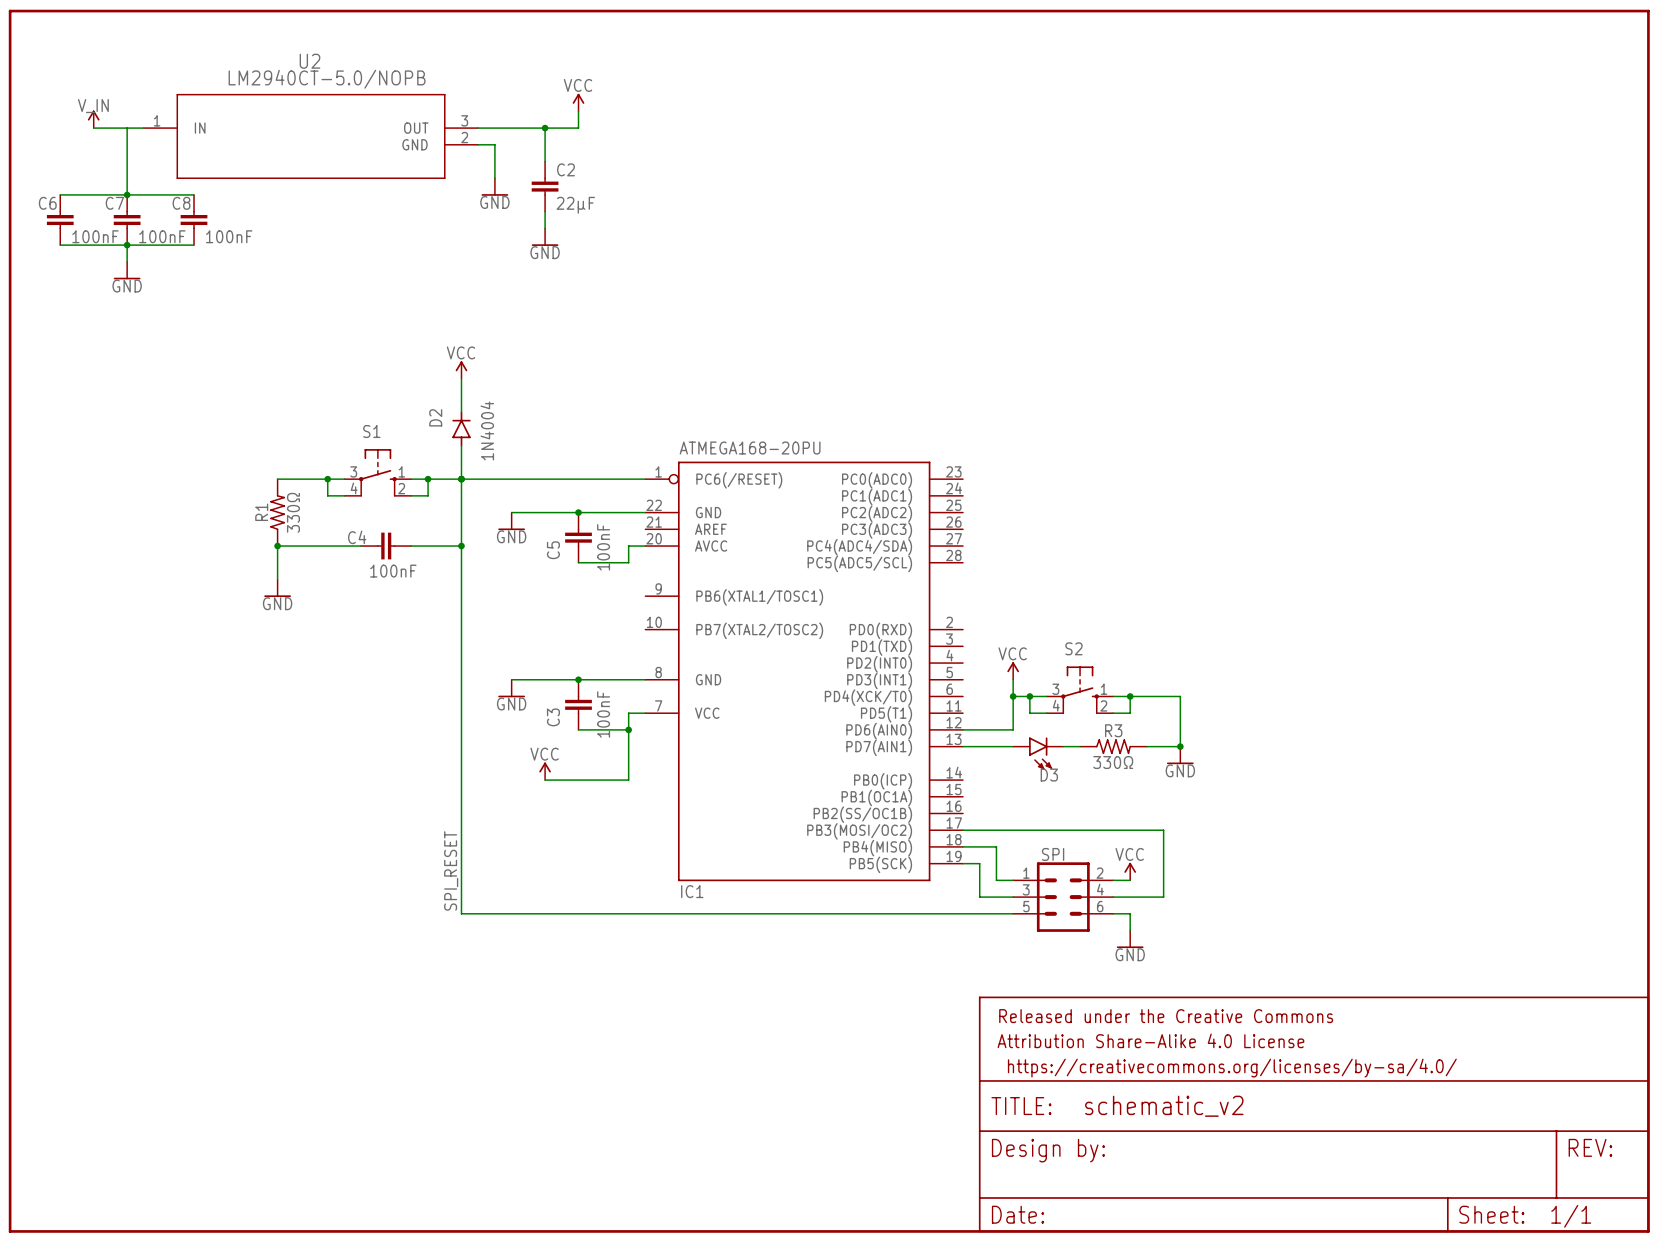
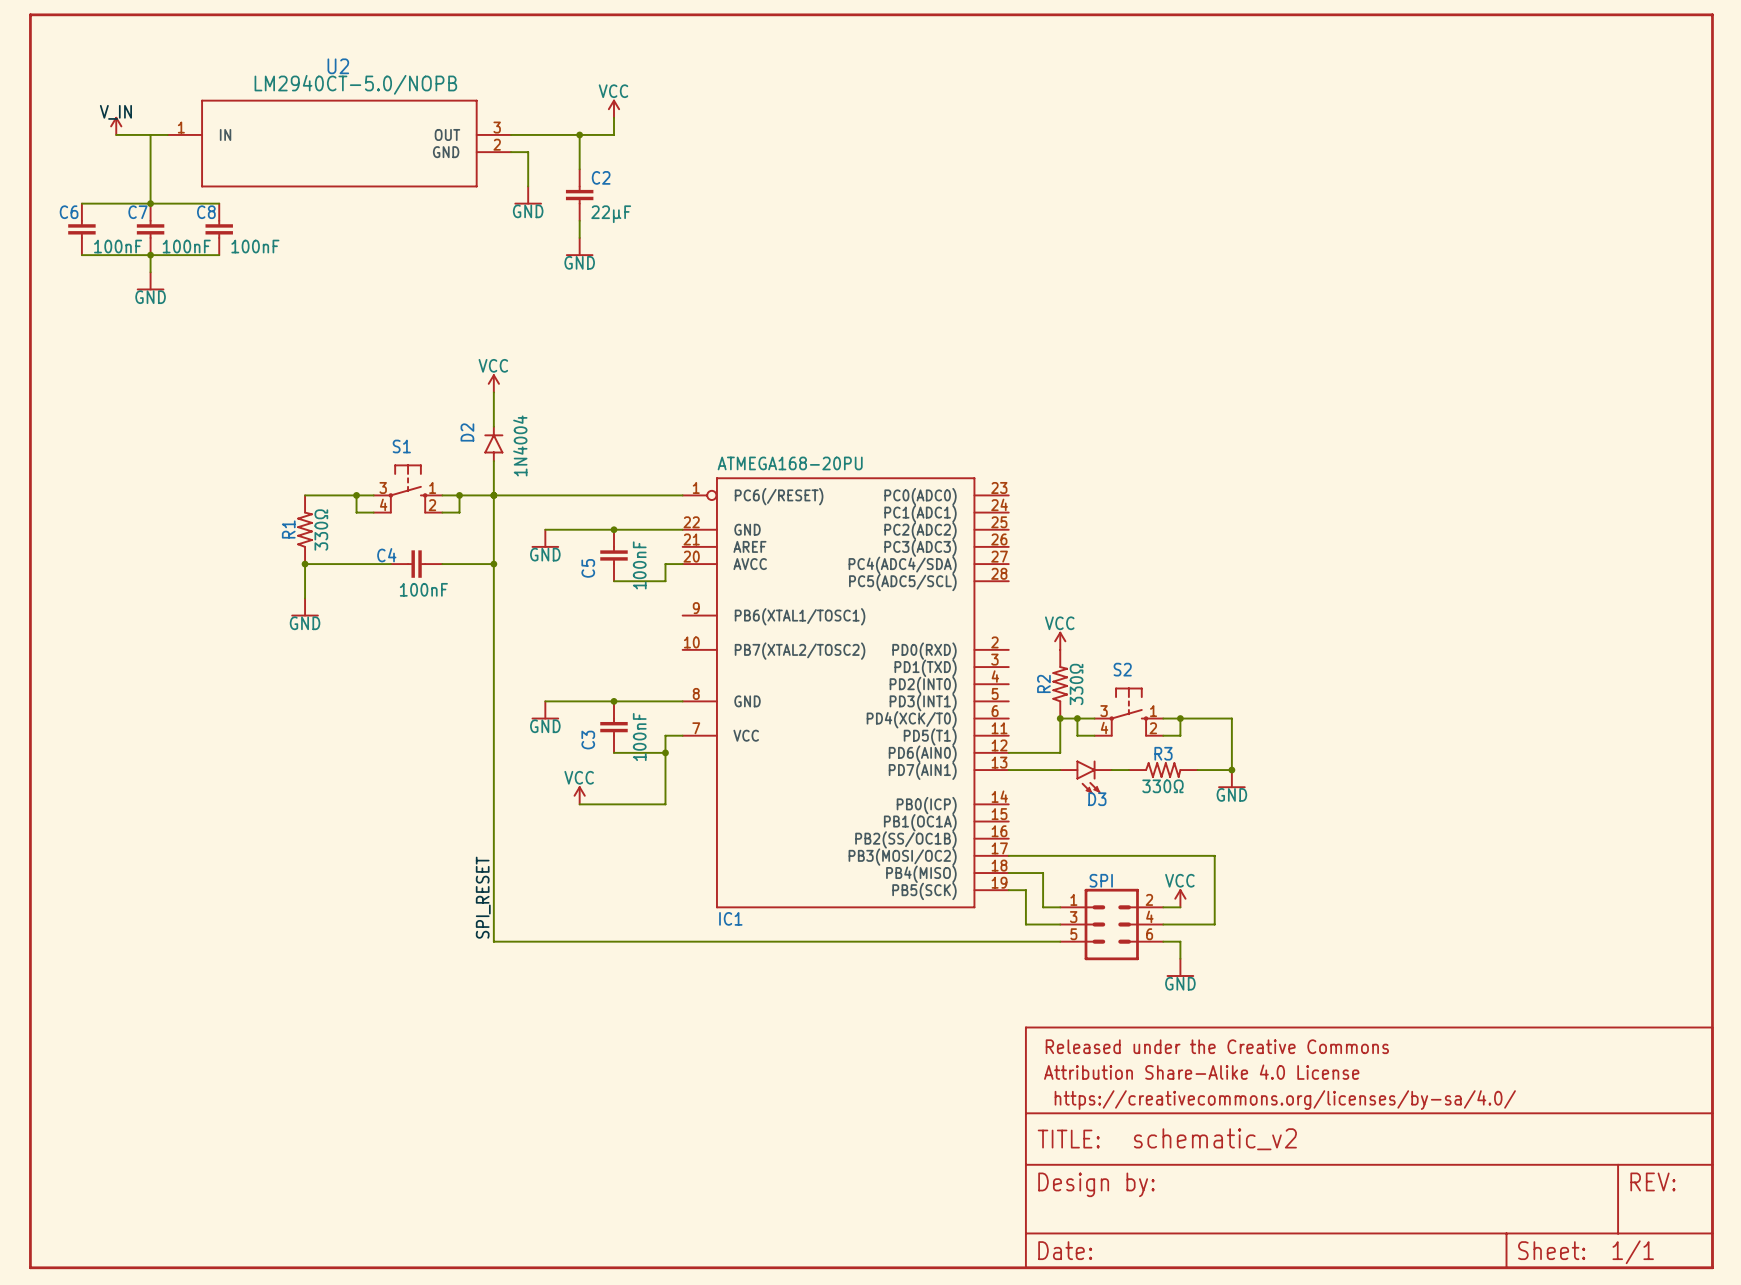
R2: none -> 330Ω (1060, 684)
power symbol position: VCC (1013, 670) -> VCC (1060, 640)

